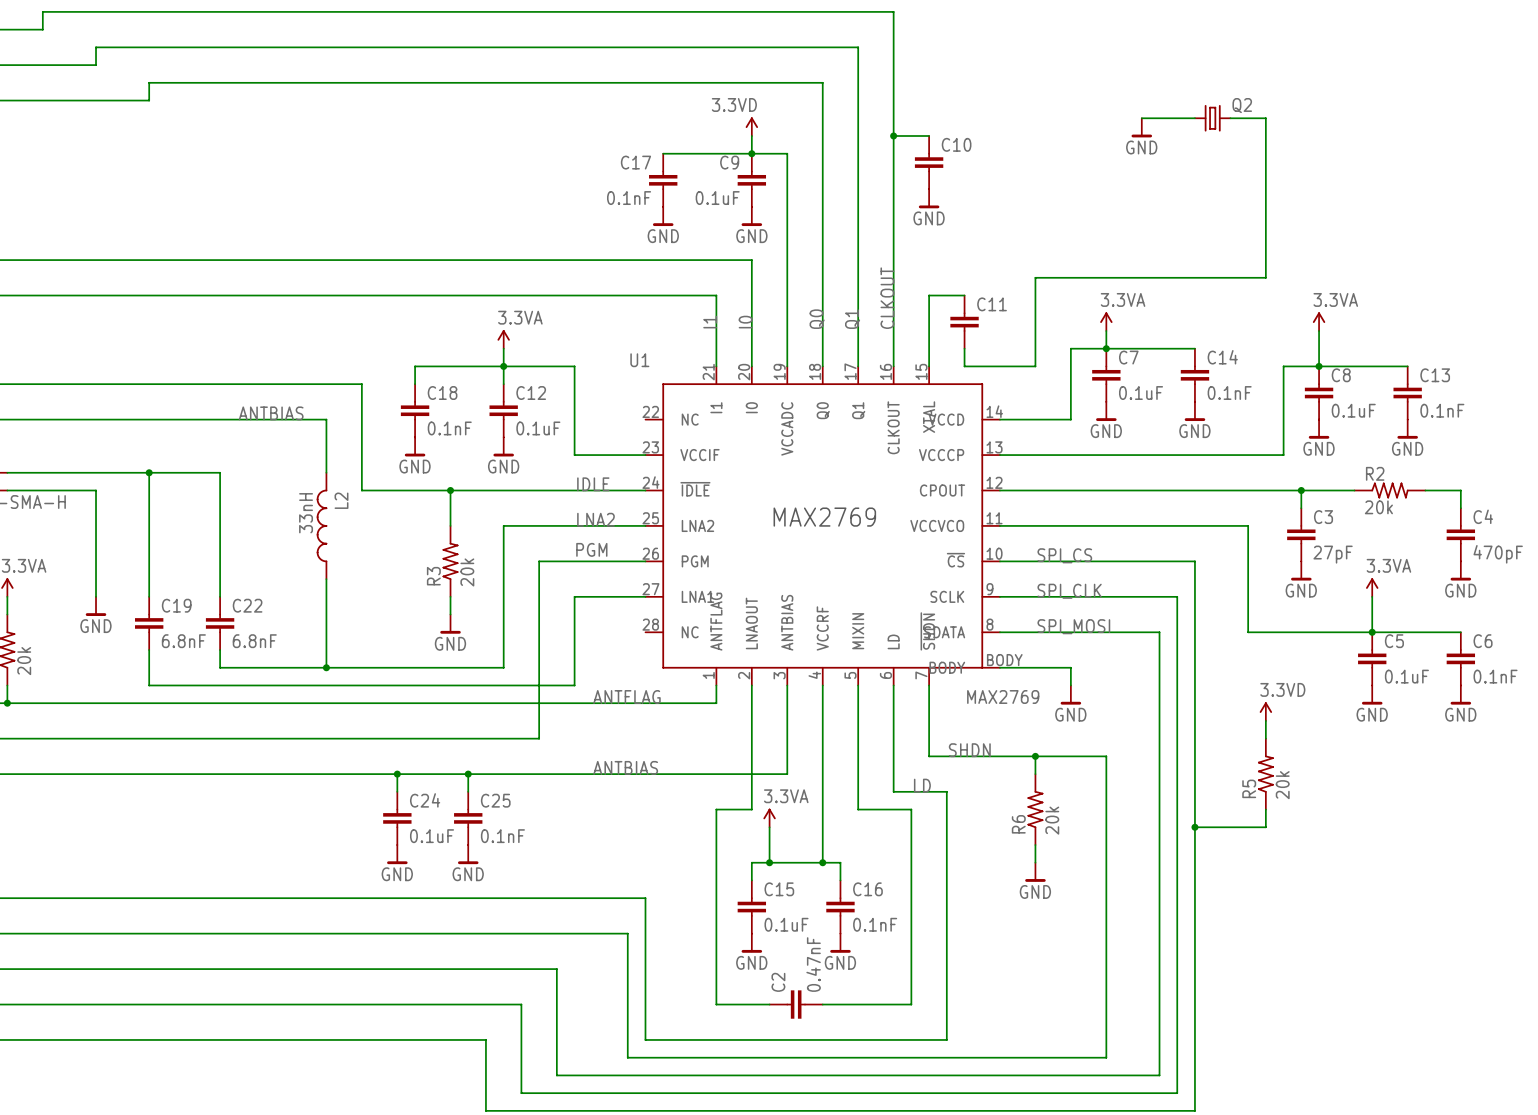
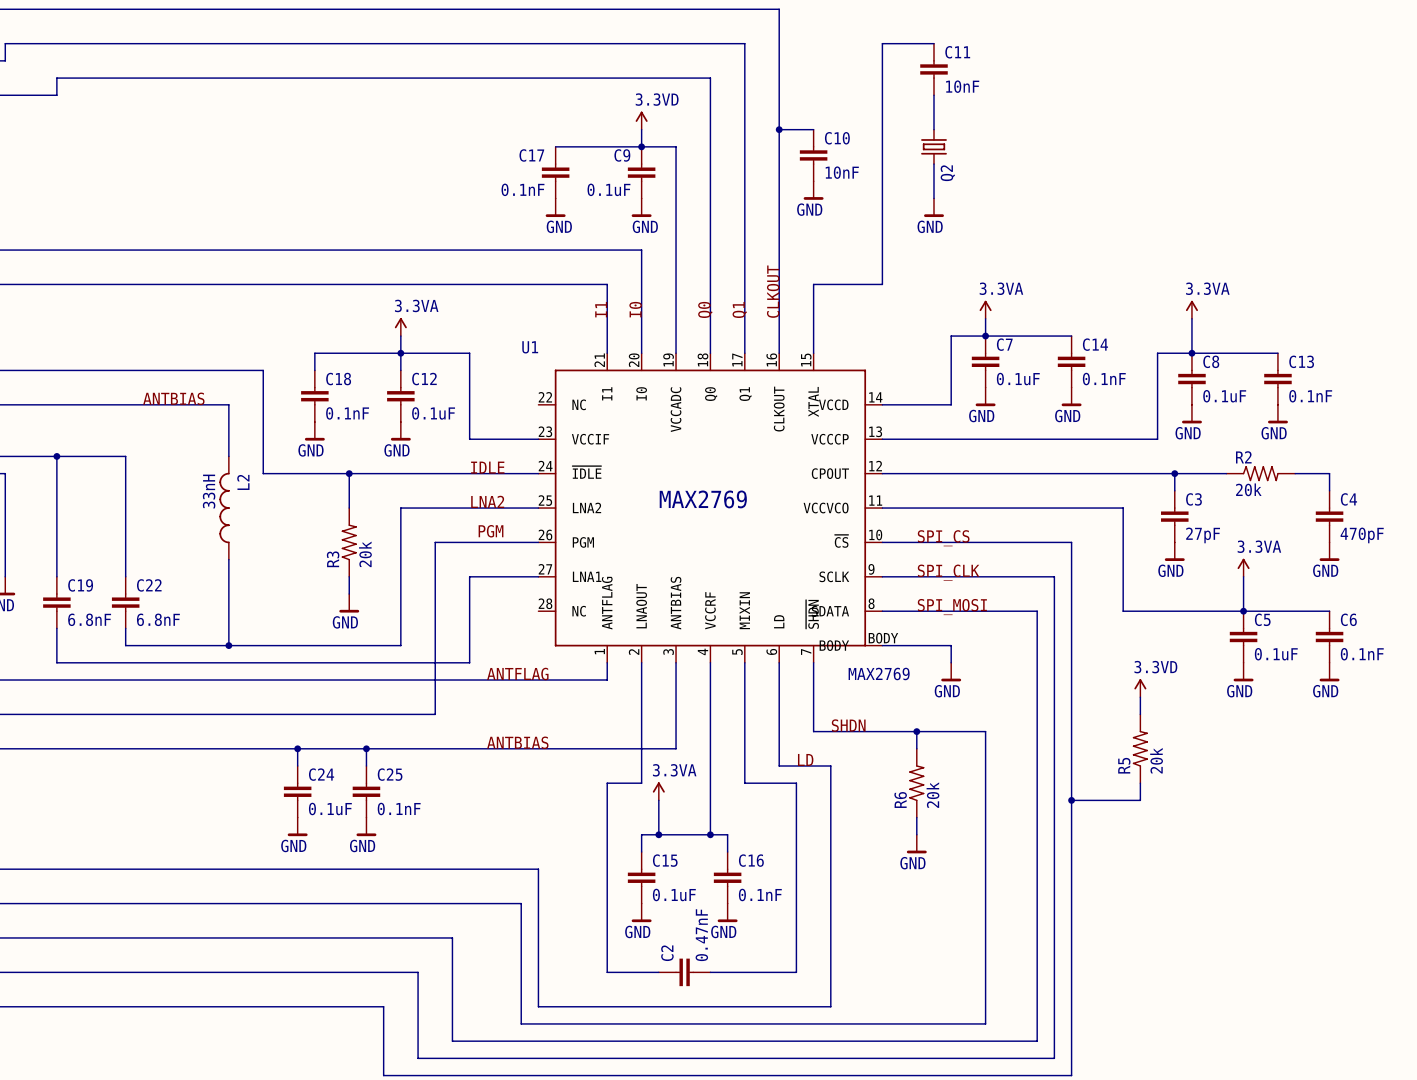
wire: none -> (933, 43) (882, 43) (882, 284) (848, 284)
C11 value: none -> 10nF (962, 86)
wire: none -> (933, 95) (933, 129)
power symbol text position: 3.3VD (734, 104) -> 3.3VD (657, 99)
wire: (1141, 118) (1194, 118) -> none
Q2 rotation: 0° (1212, 118) -> 90° clockwise (933, 146)
Q2 position: (1212, 118) -> (933, 146)
wire: (1230, 118) (1265, 118) (1265, 277) (1035, 277) (1035, 366) (964, 366) (964, 348) -> none
power symbol position: GND (1141, 127) -> GND (933, 207)
wire: none -> (933, 164) (933, 198)
C10 value: none -> 10nF (842, 172)
C11 position: (964, 322) -> (933, 69)

